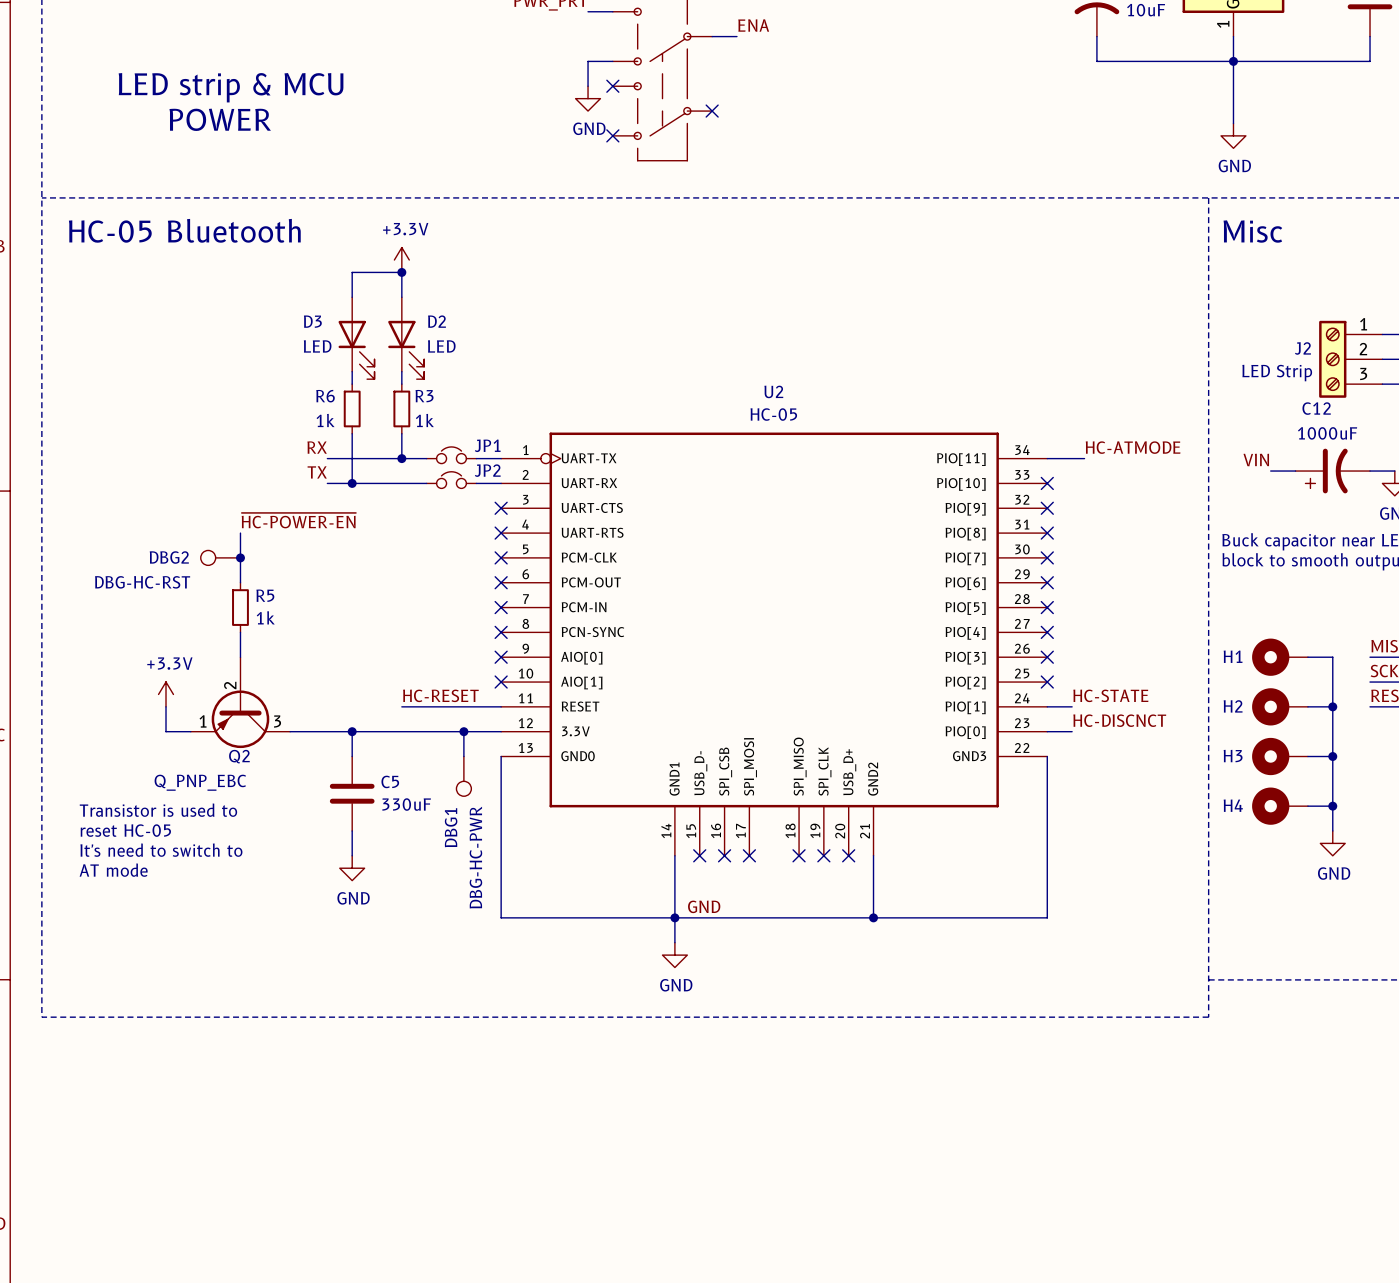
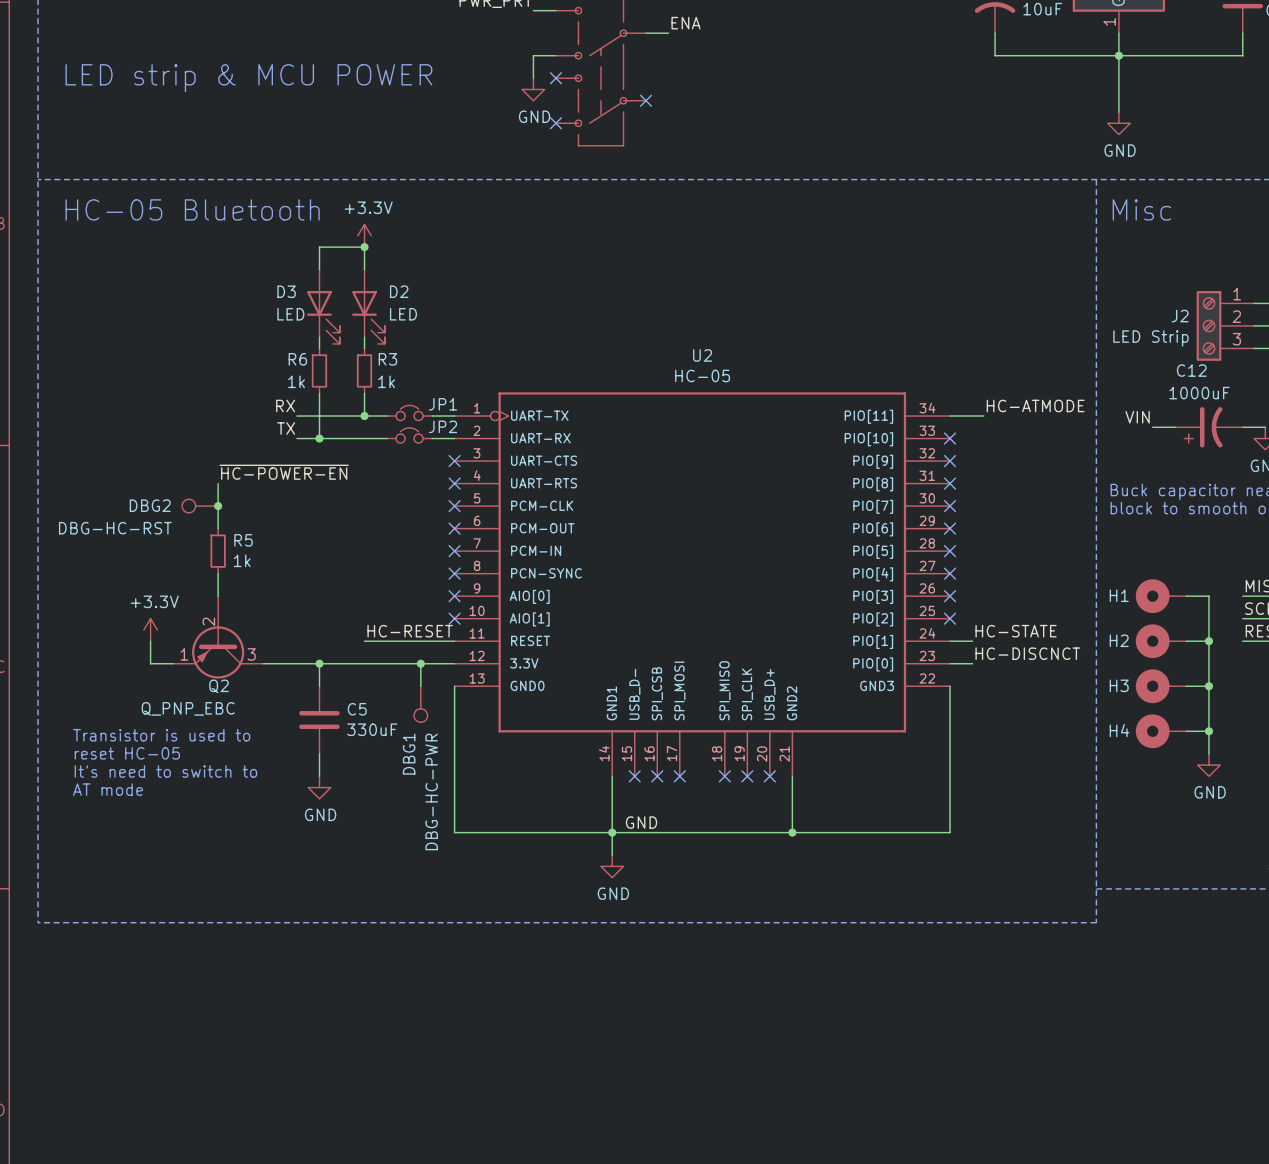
text: LED strip & MCU (231, 87) -> LED strip & MCU POWER (248, 78)
text: POWER (220, 119) -> none

